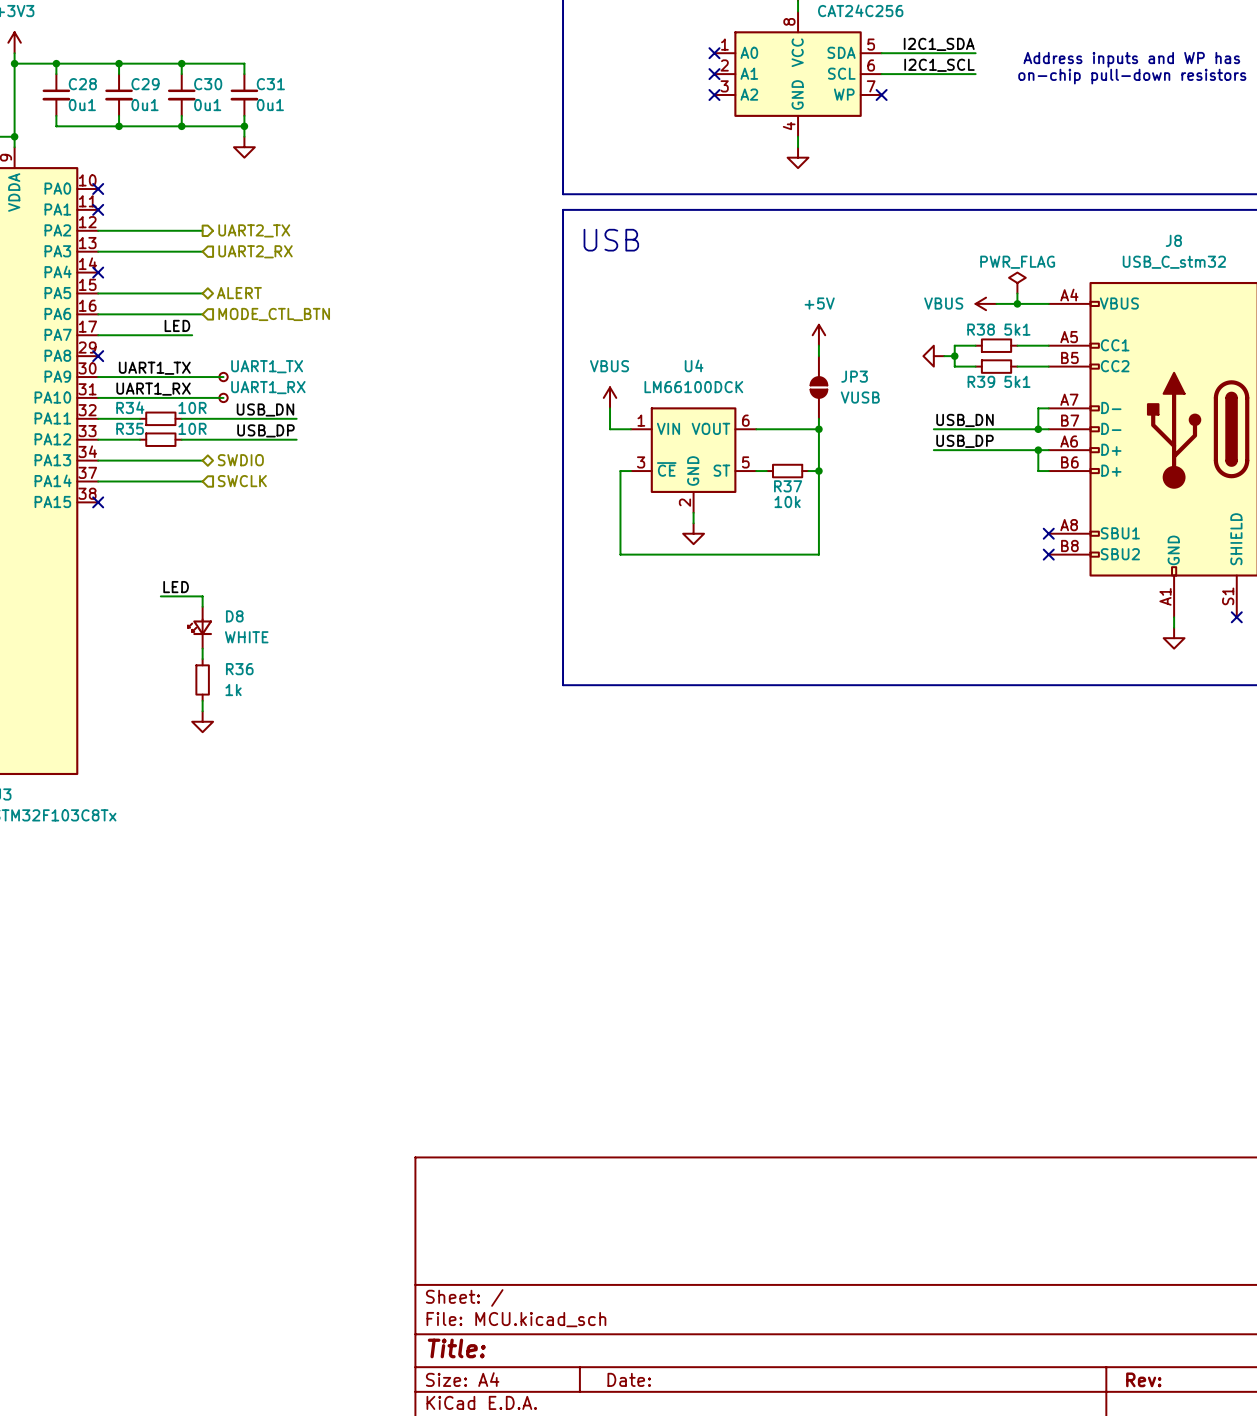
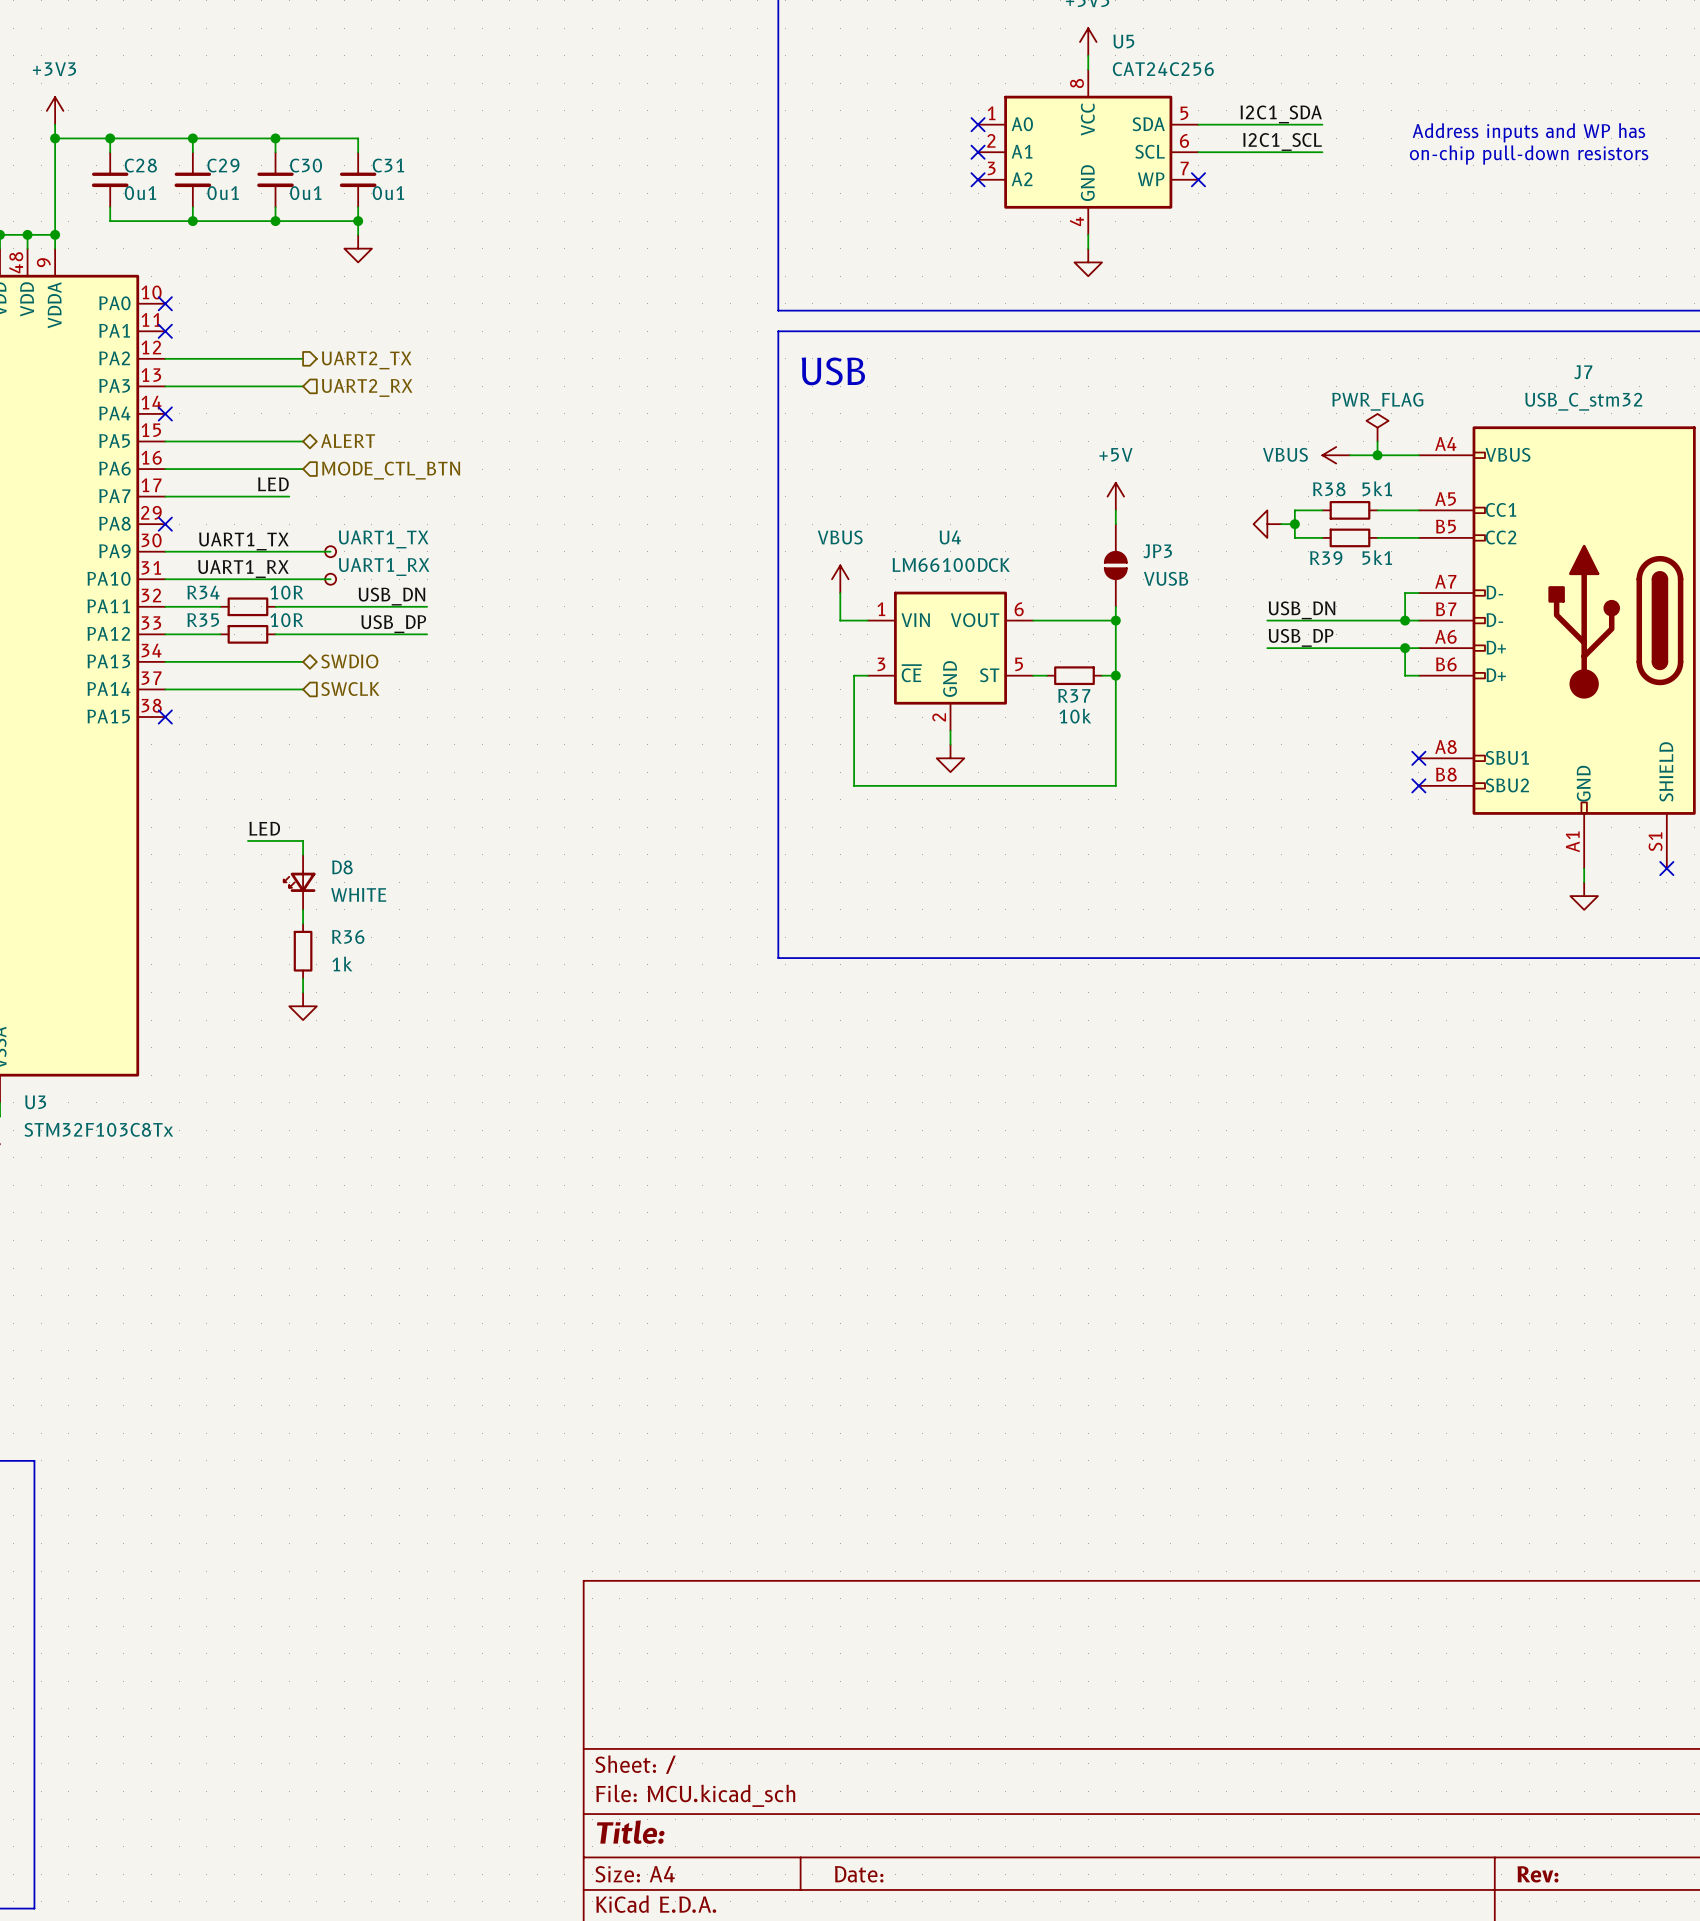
J8 name: J8 (1173, 240) -> J7 (1583, 372)

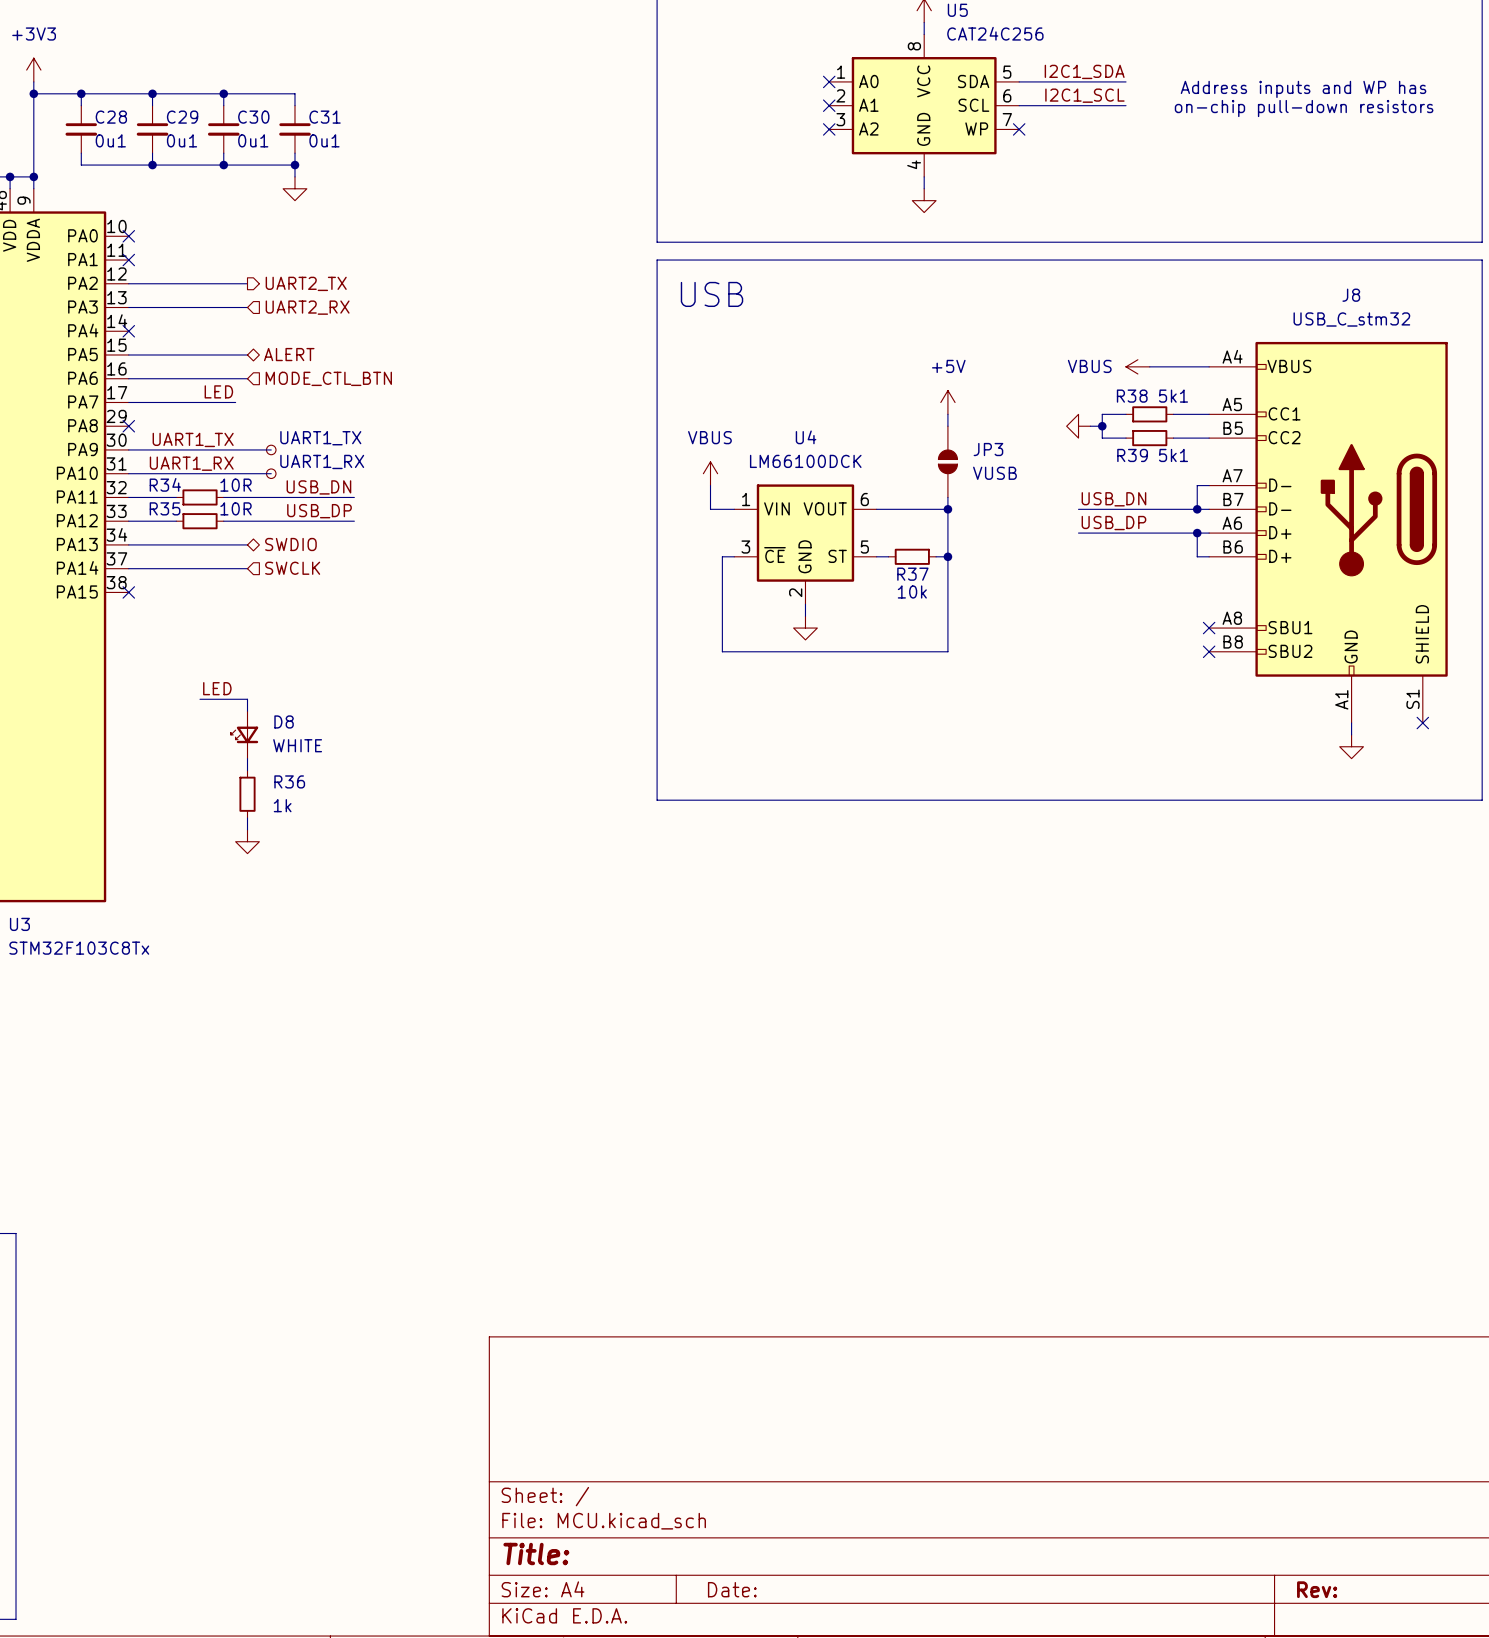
J7 name: J7 (1583, 372) -> J8 (1351, 295)
power symbol: PWR_FLAG (1377, 427) -> none
wire: (1377, 441) (1377, 455) -> none
junction: (1377, 455) -> none

